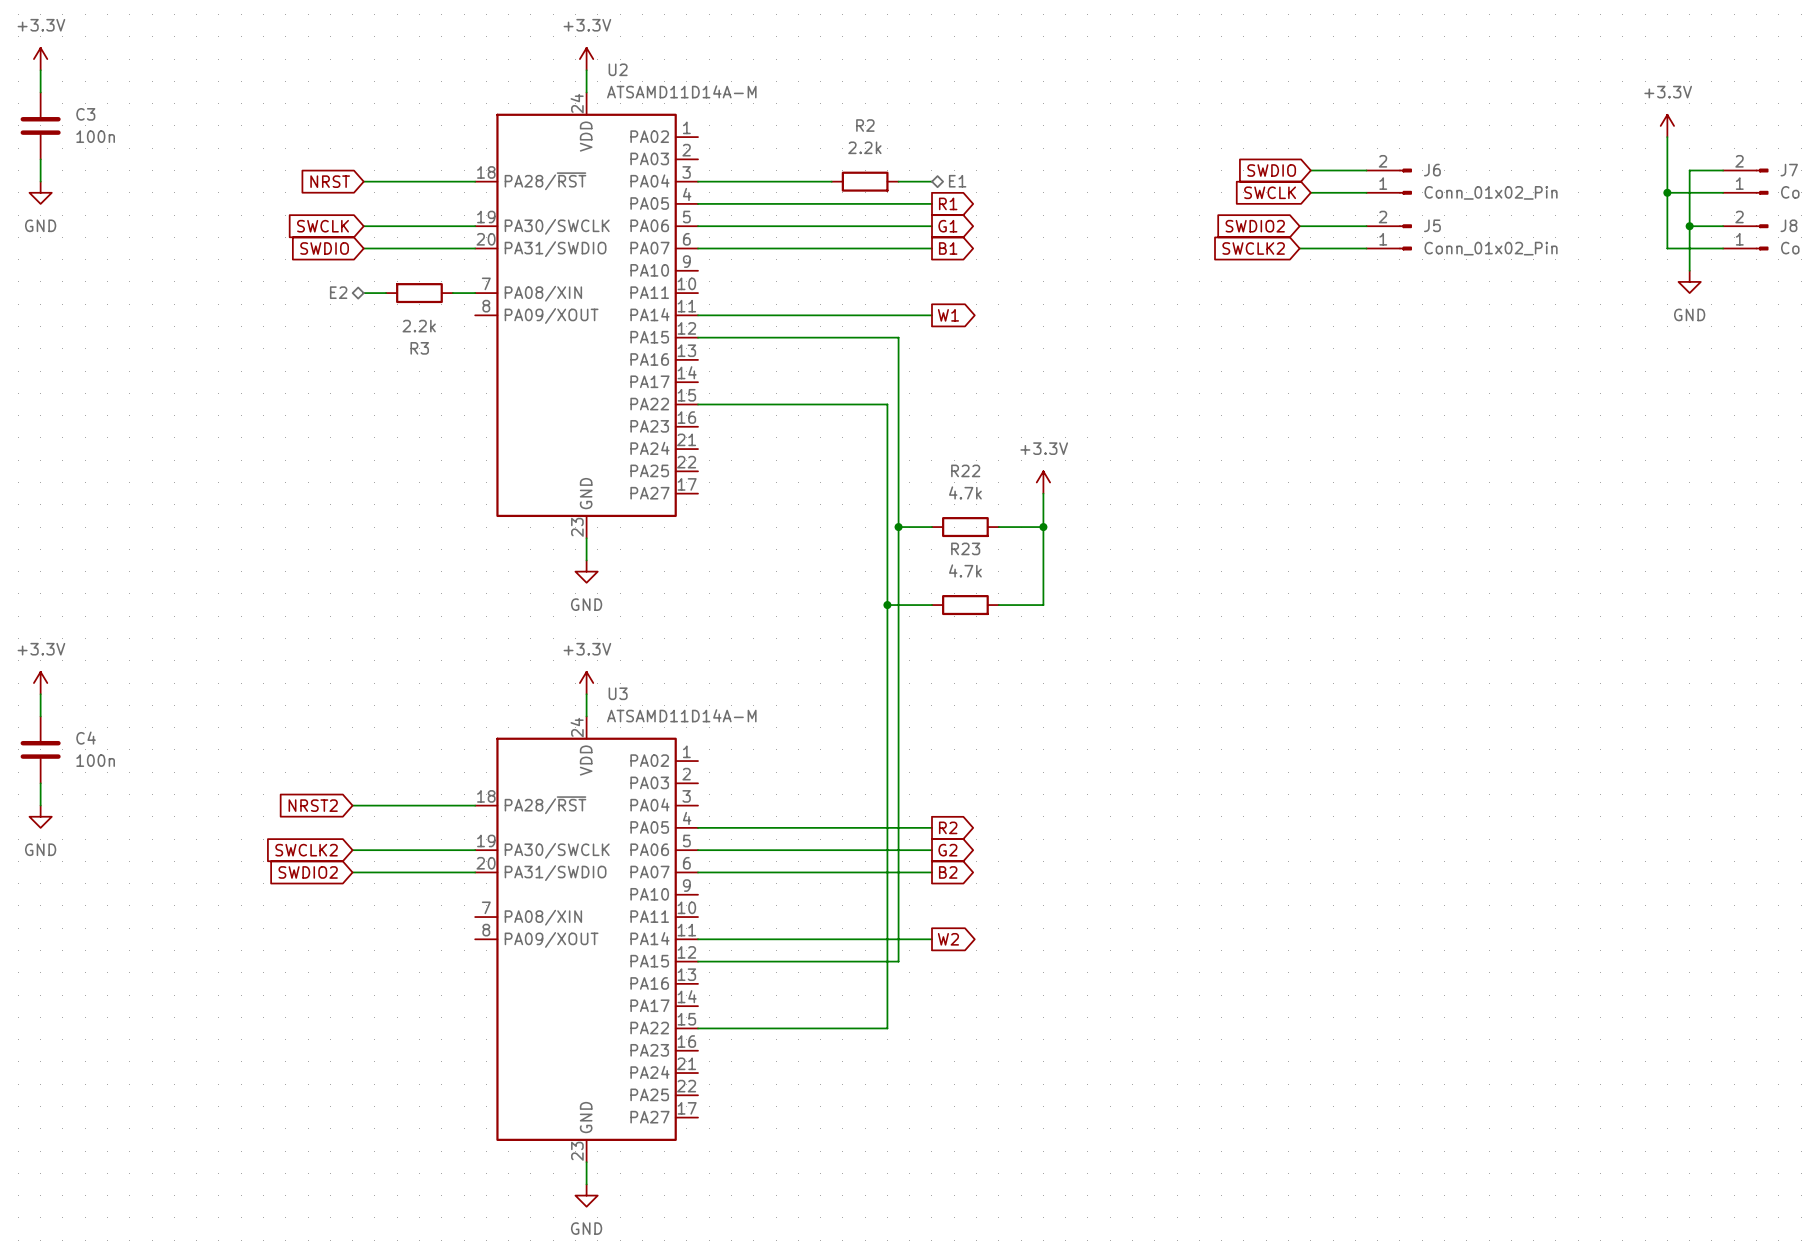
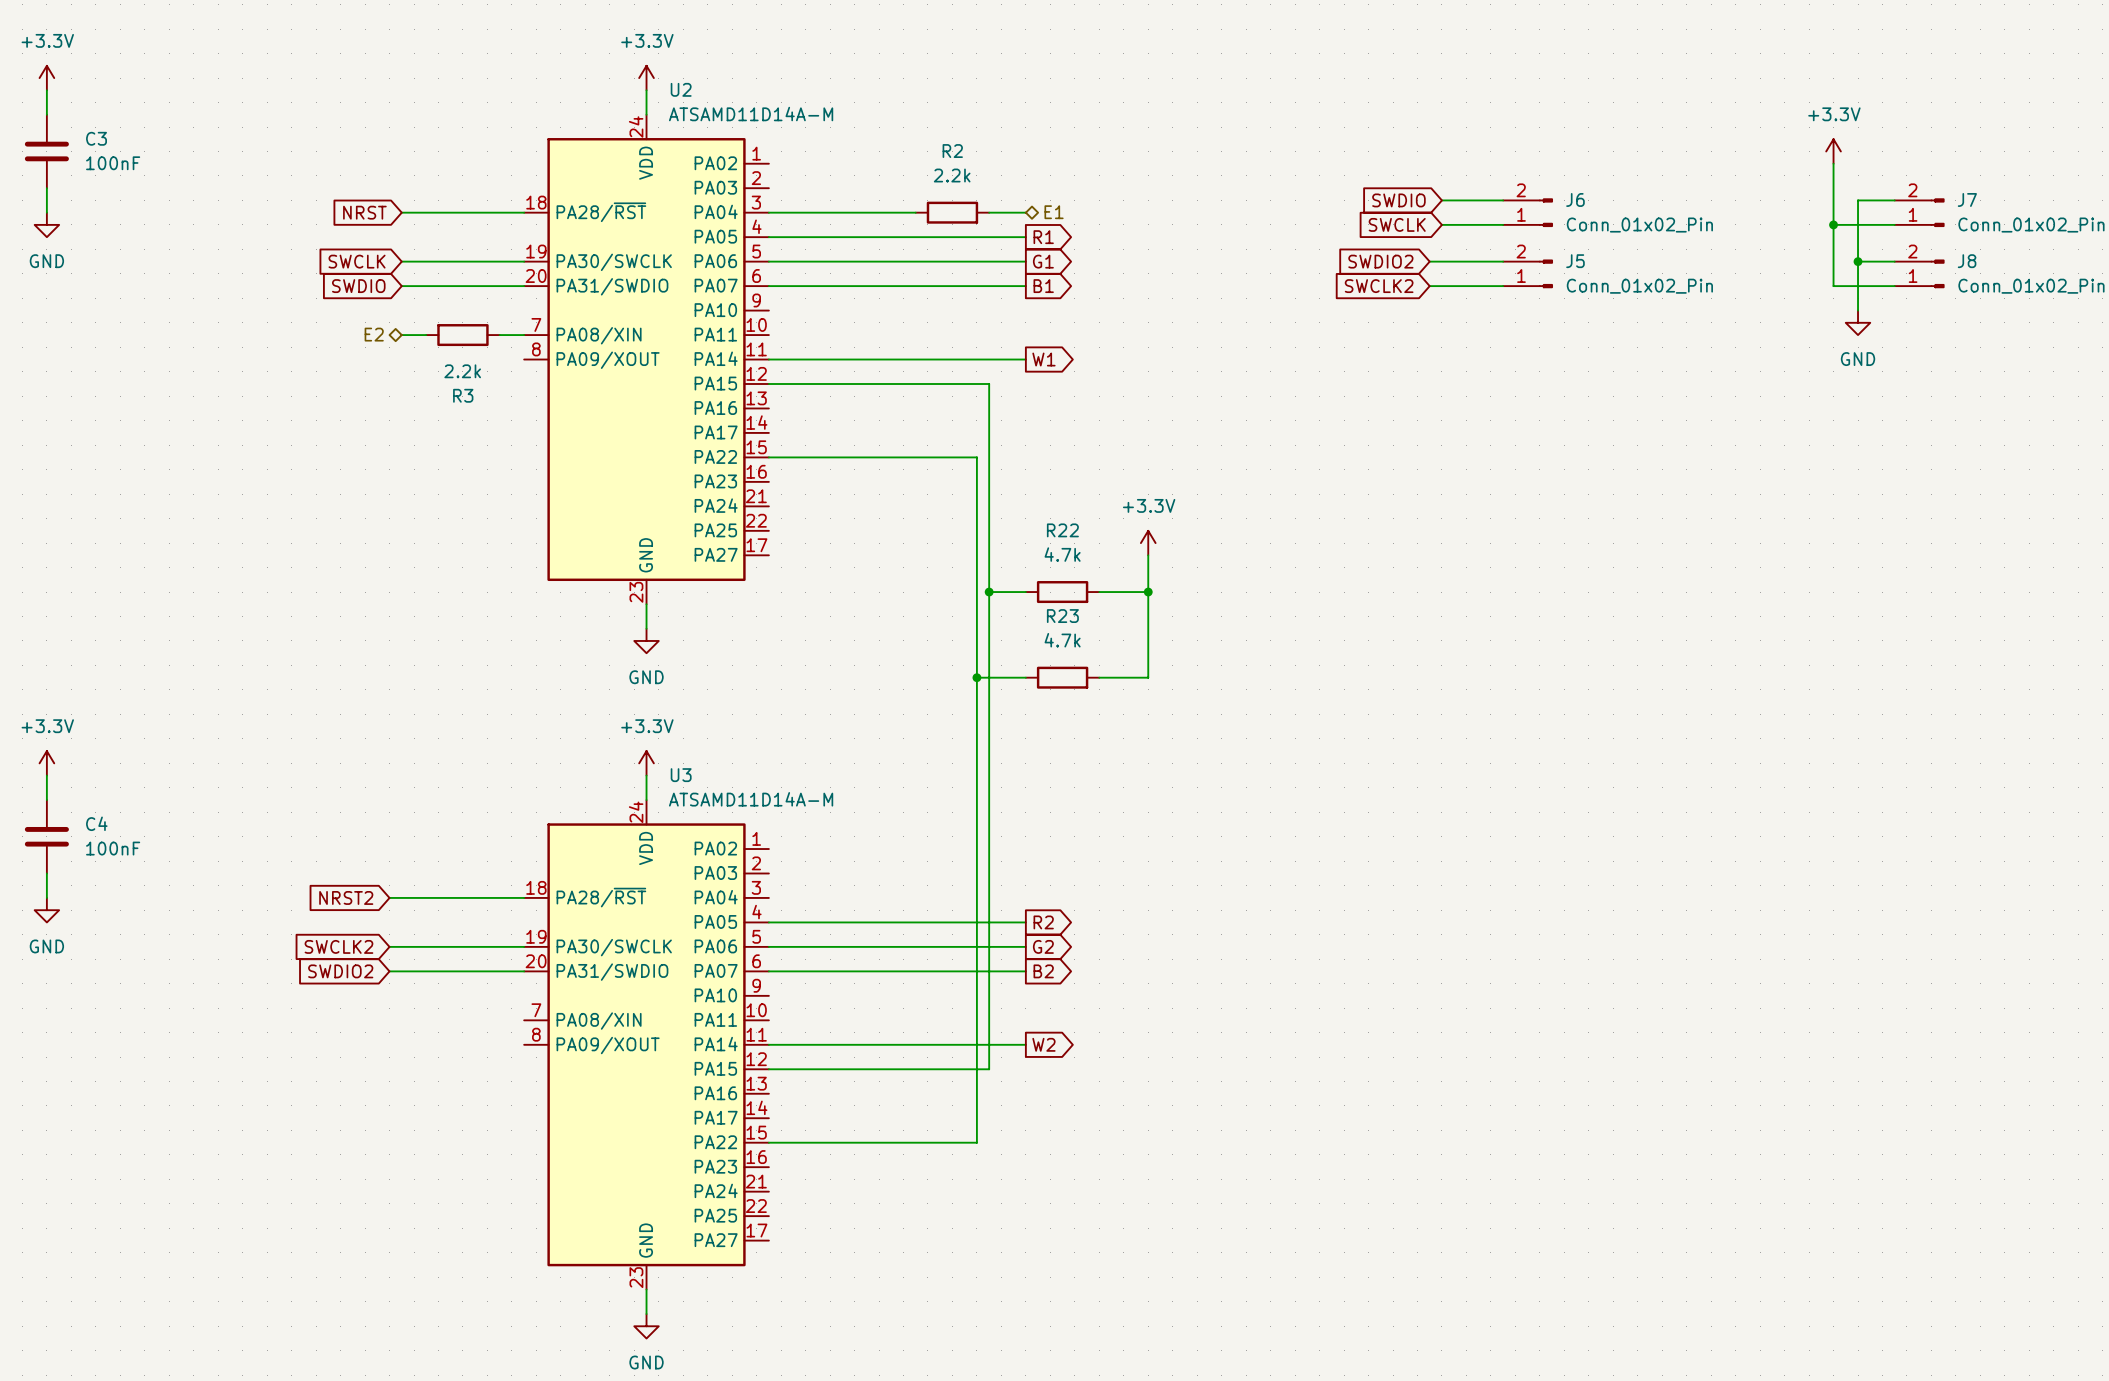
C3 value: 100n (95, 136) -> 100nF (113, 163)
C4 value: 100n (95, 760) -> 100nF (113, 848)

